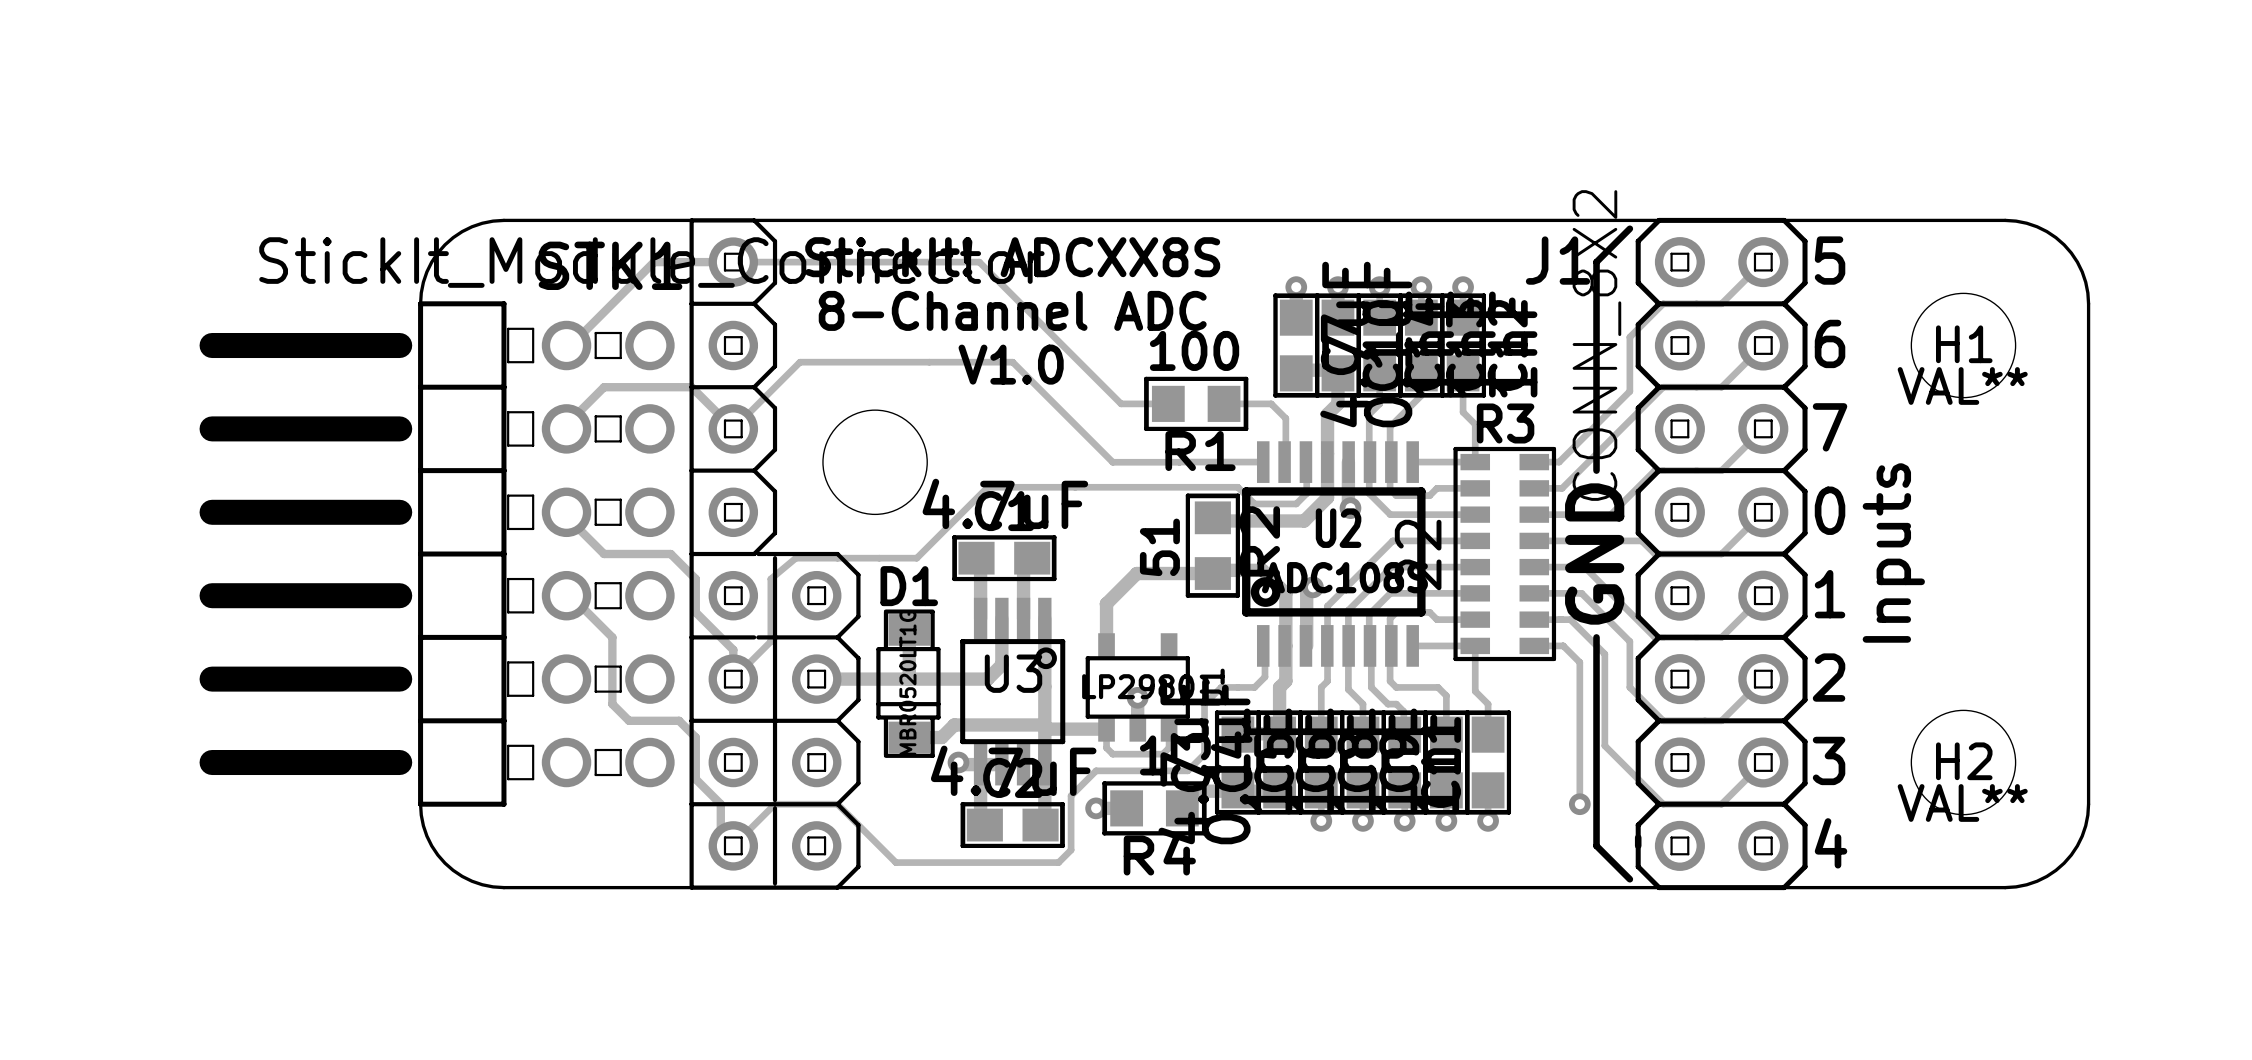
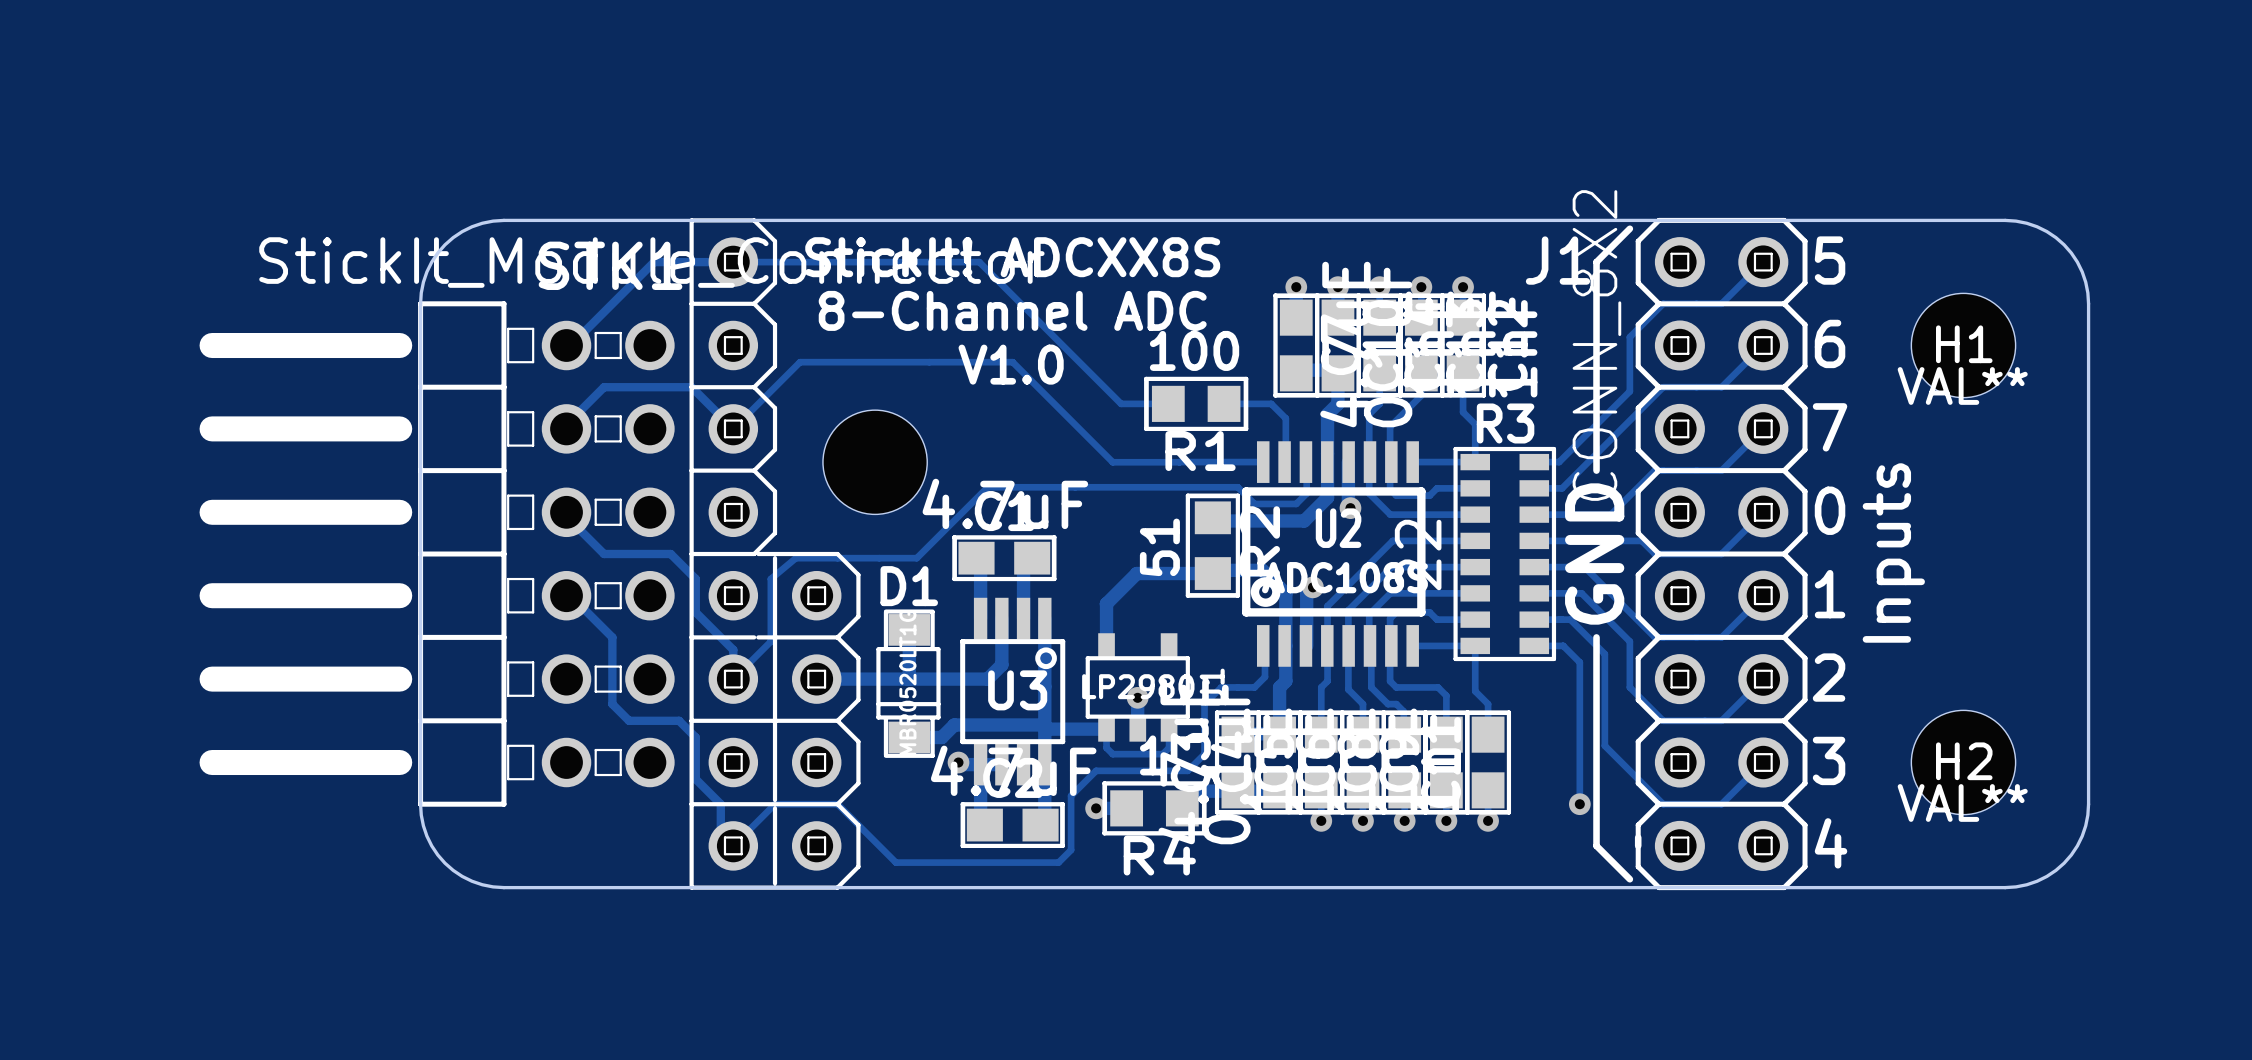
U3 name position: U3 (1013, 673) -> U3 (1017, 690)

